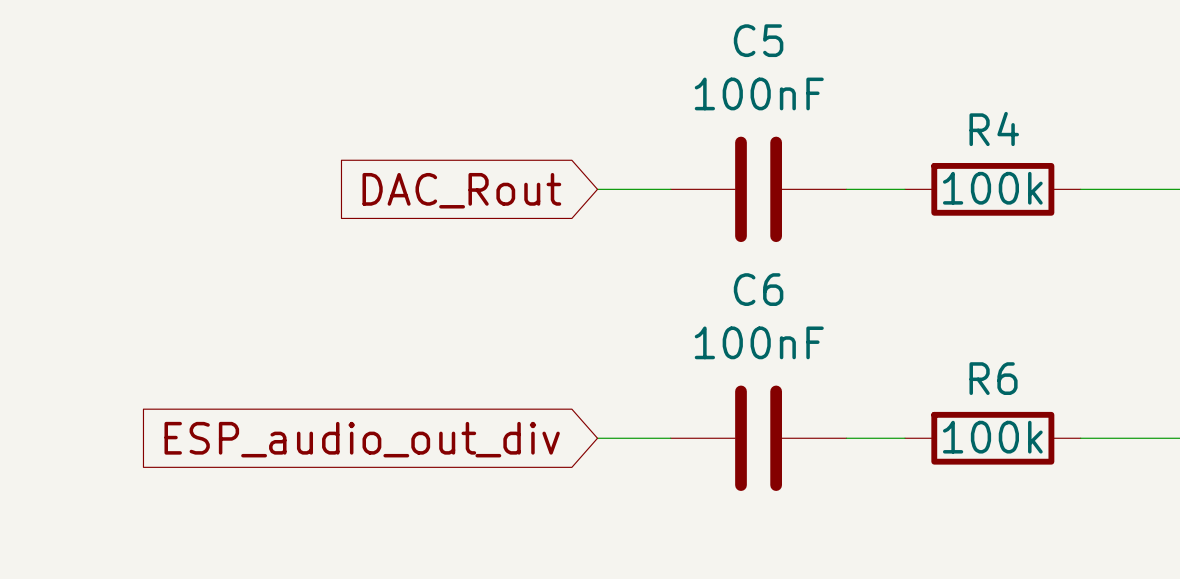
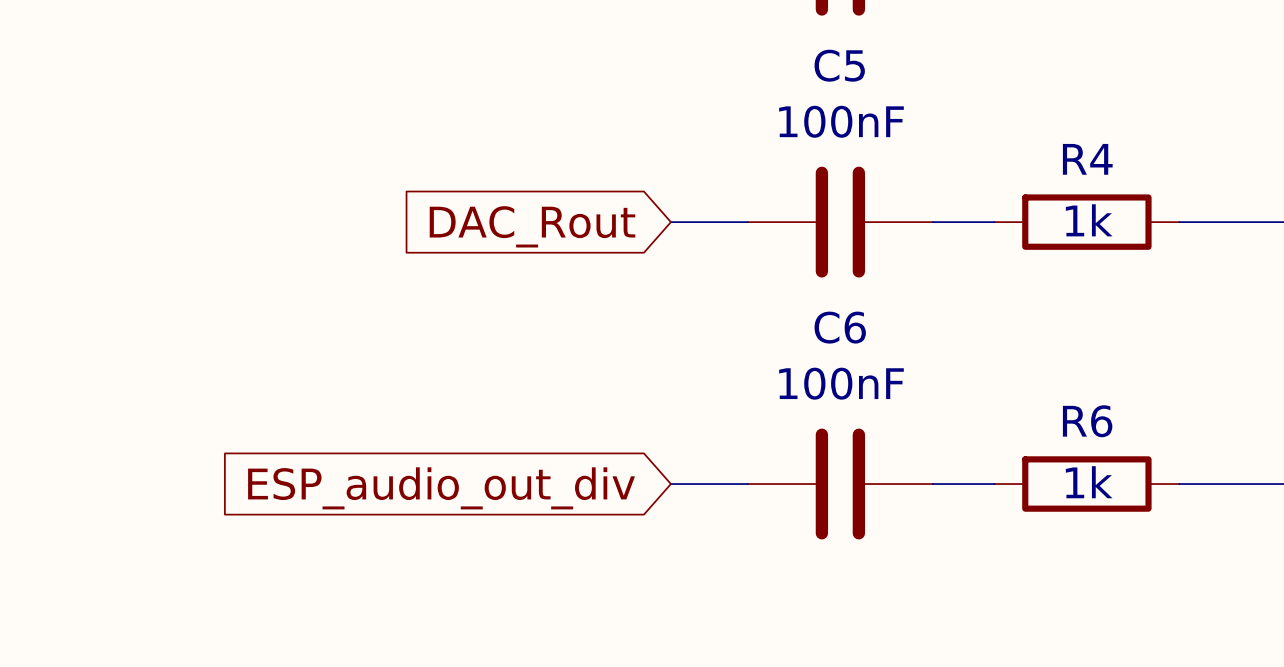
R4 value: 100k (992, 188) -> 1k (1089, 220)
R6 value: 100k (992, 437) -> 1k (1089, 482)

